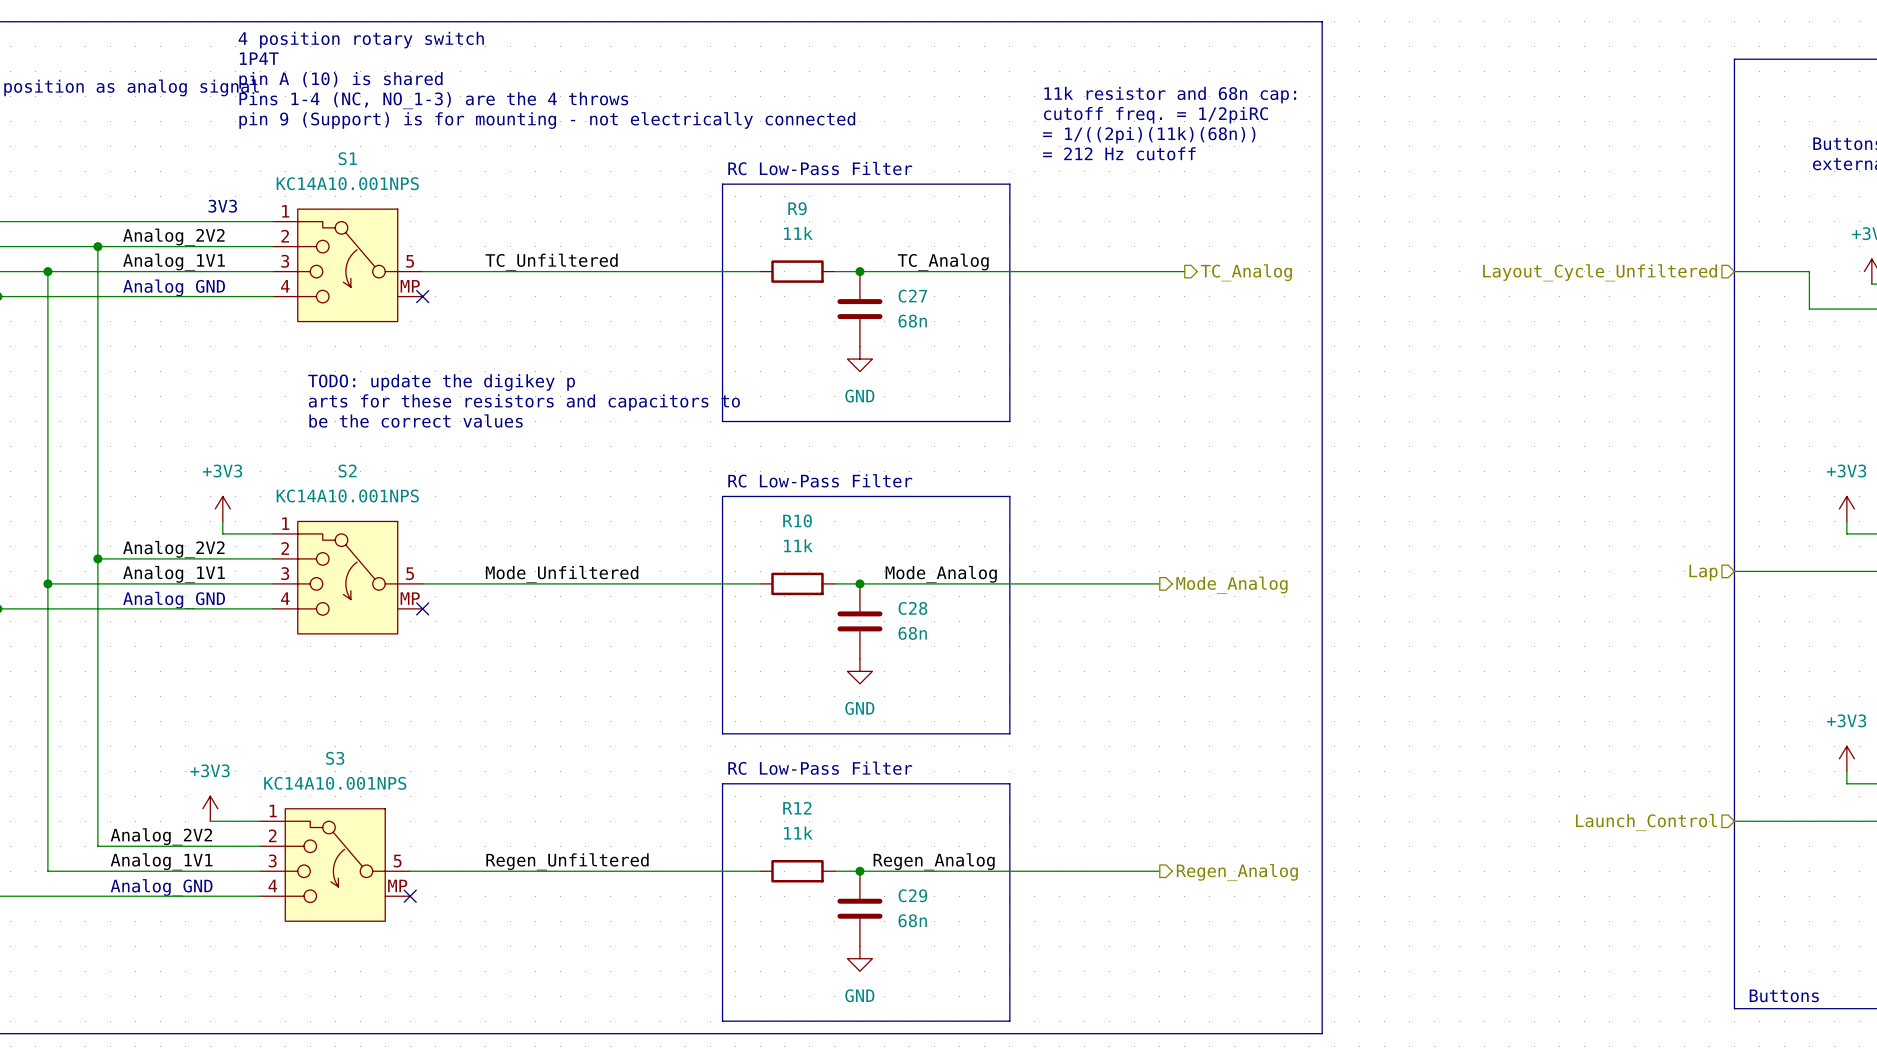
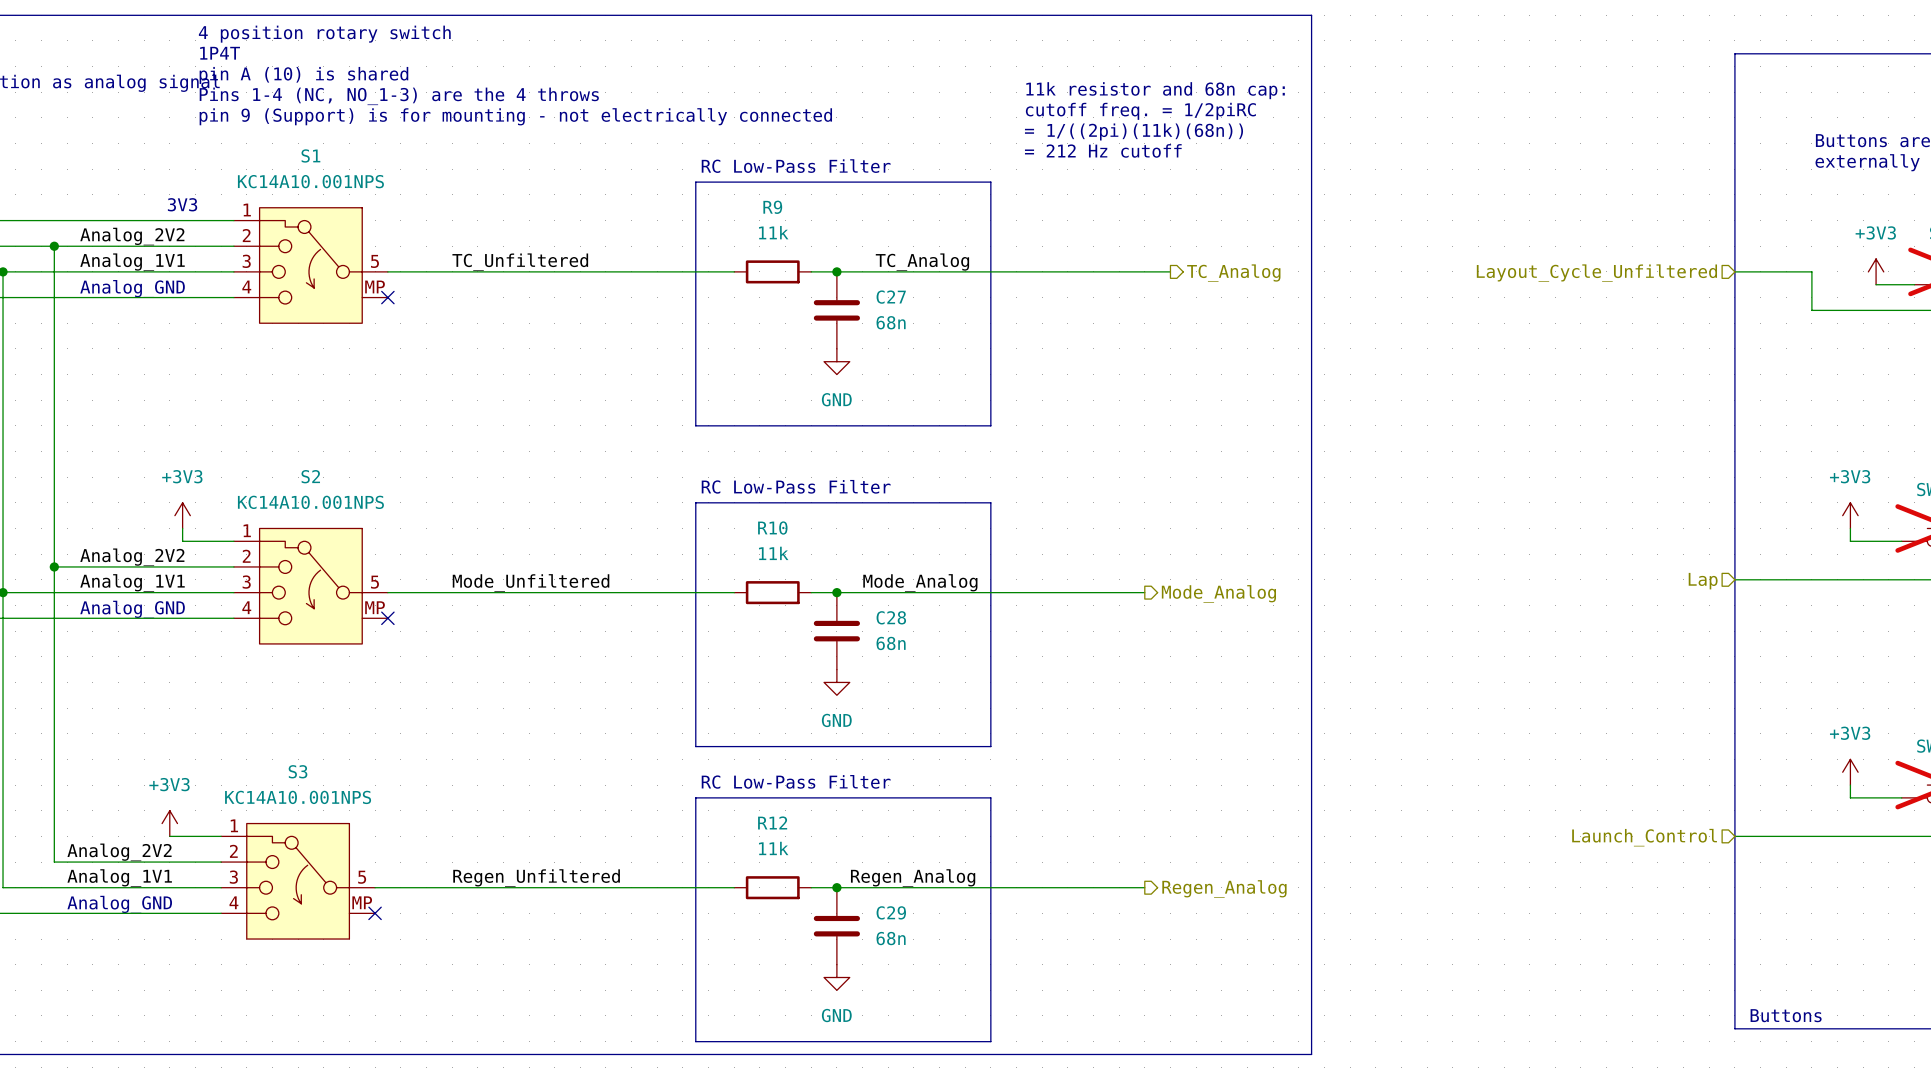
text: TODO: update the digikey p (441, 382) -> none
text: arts for these resistors and capacitors to (524, 402) -> none
text: be the correct values (416, 421) -> none

